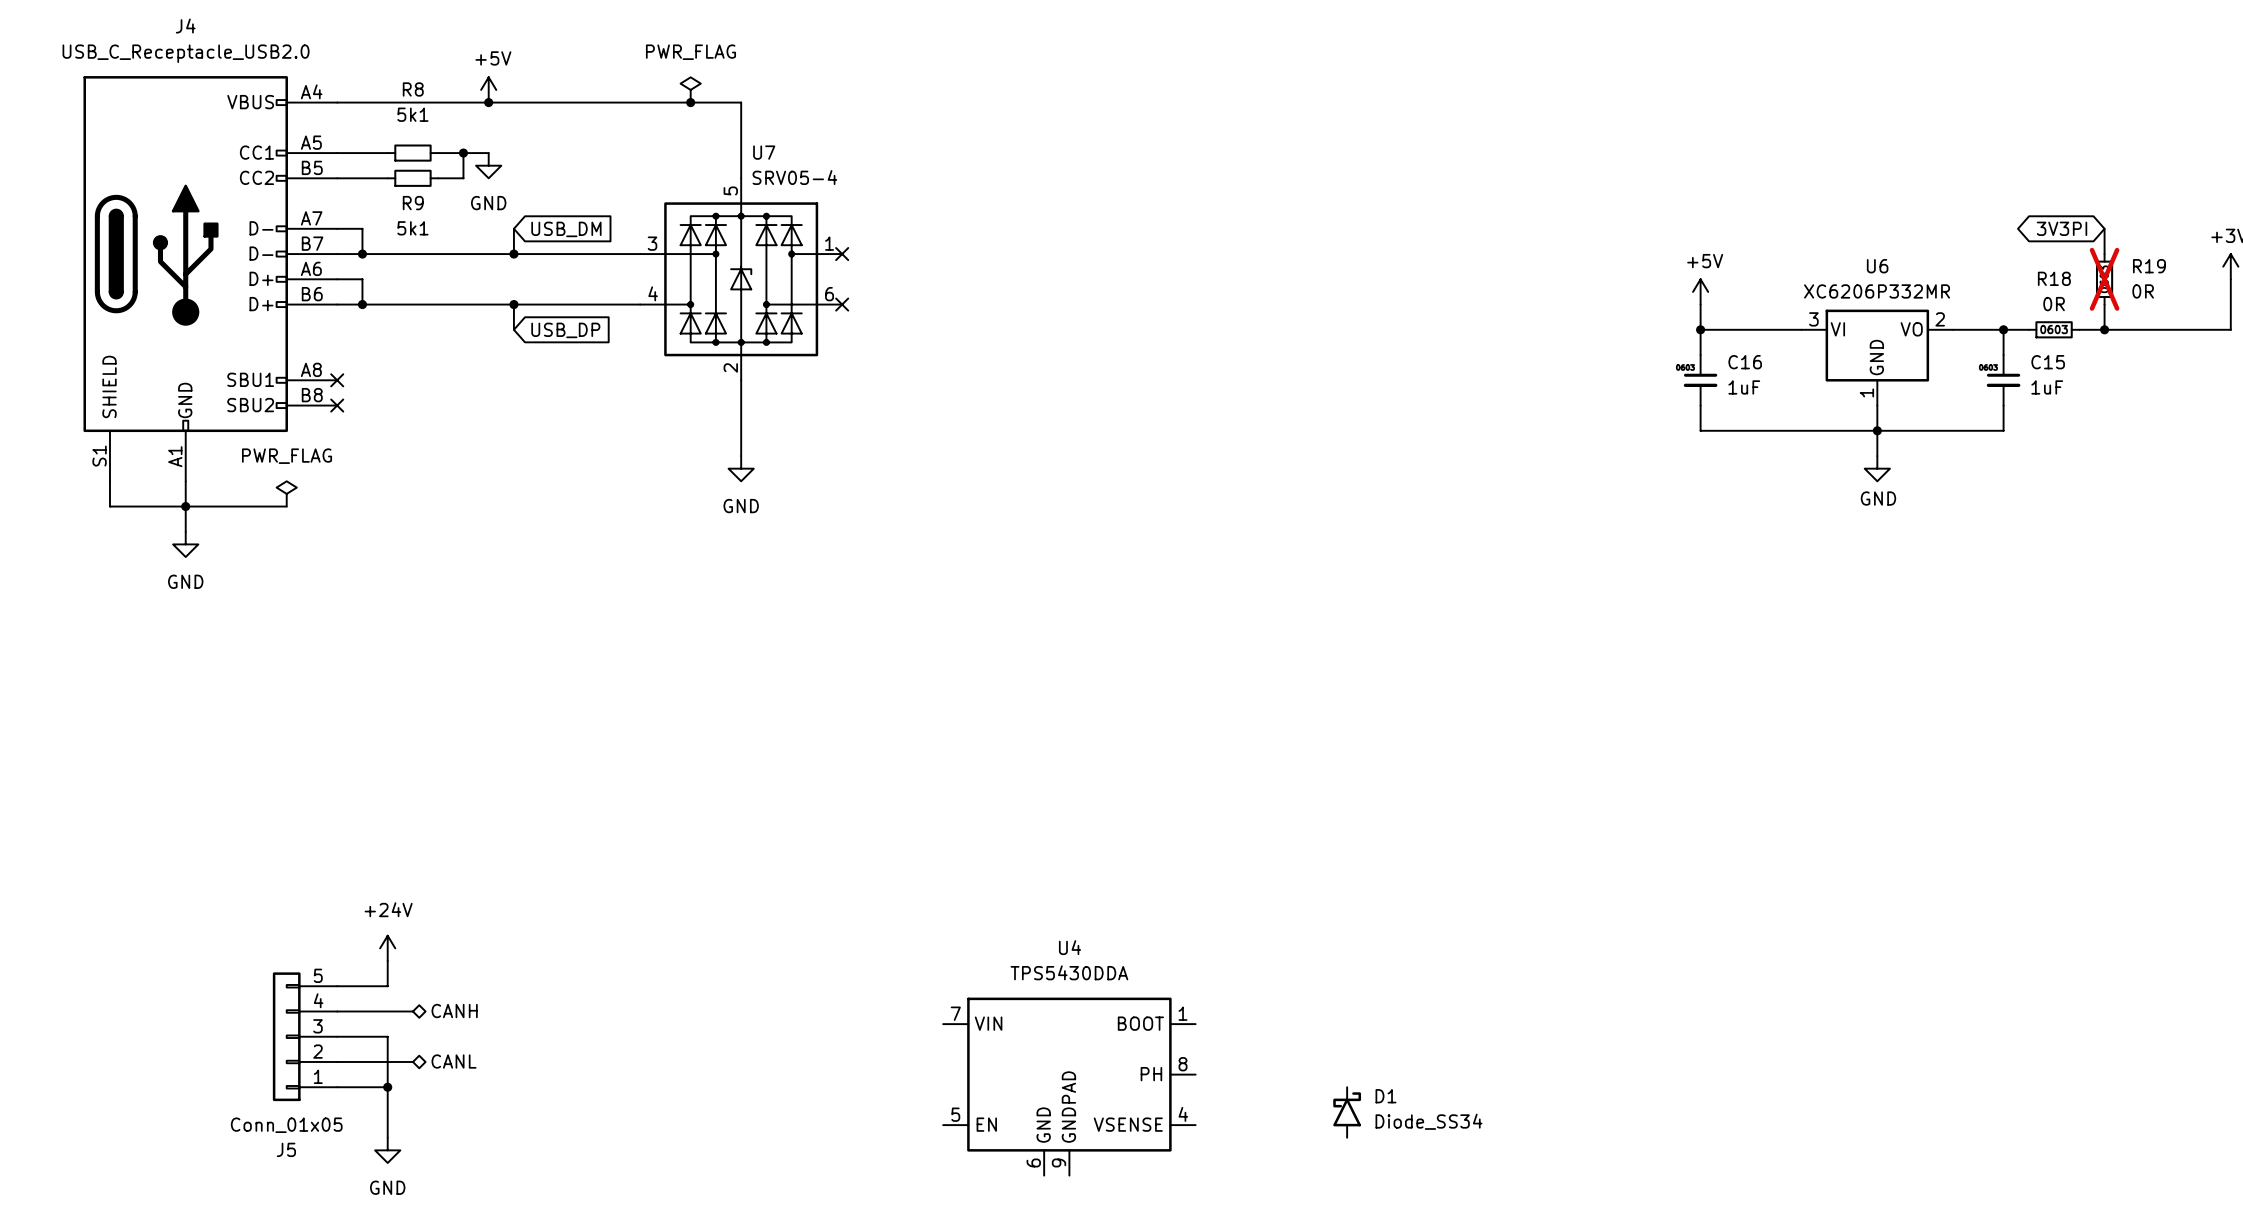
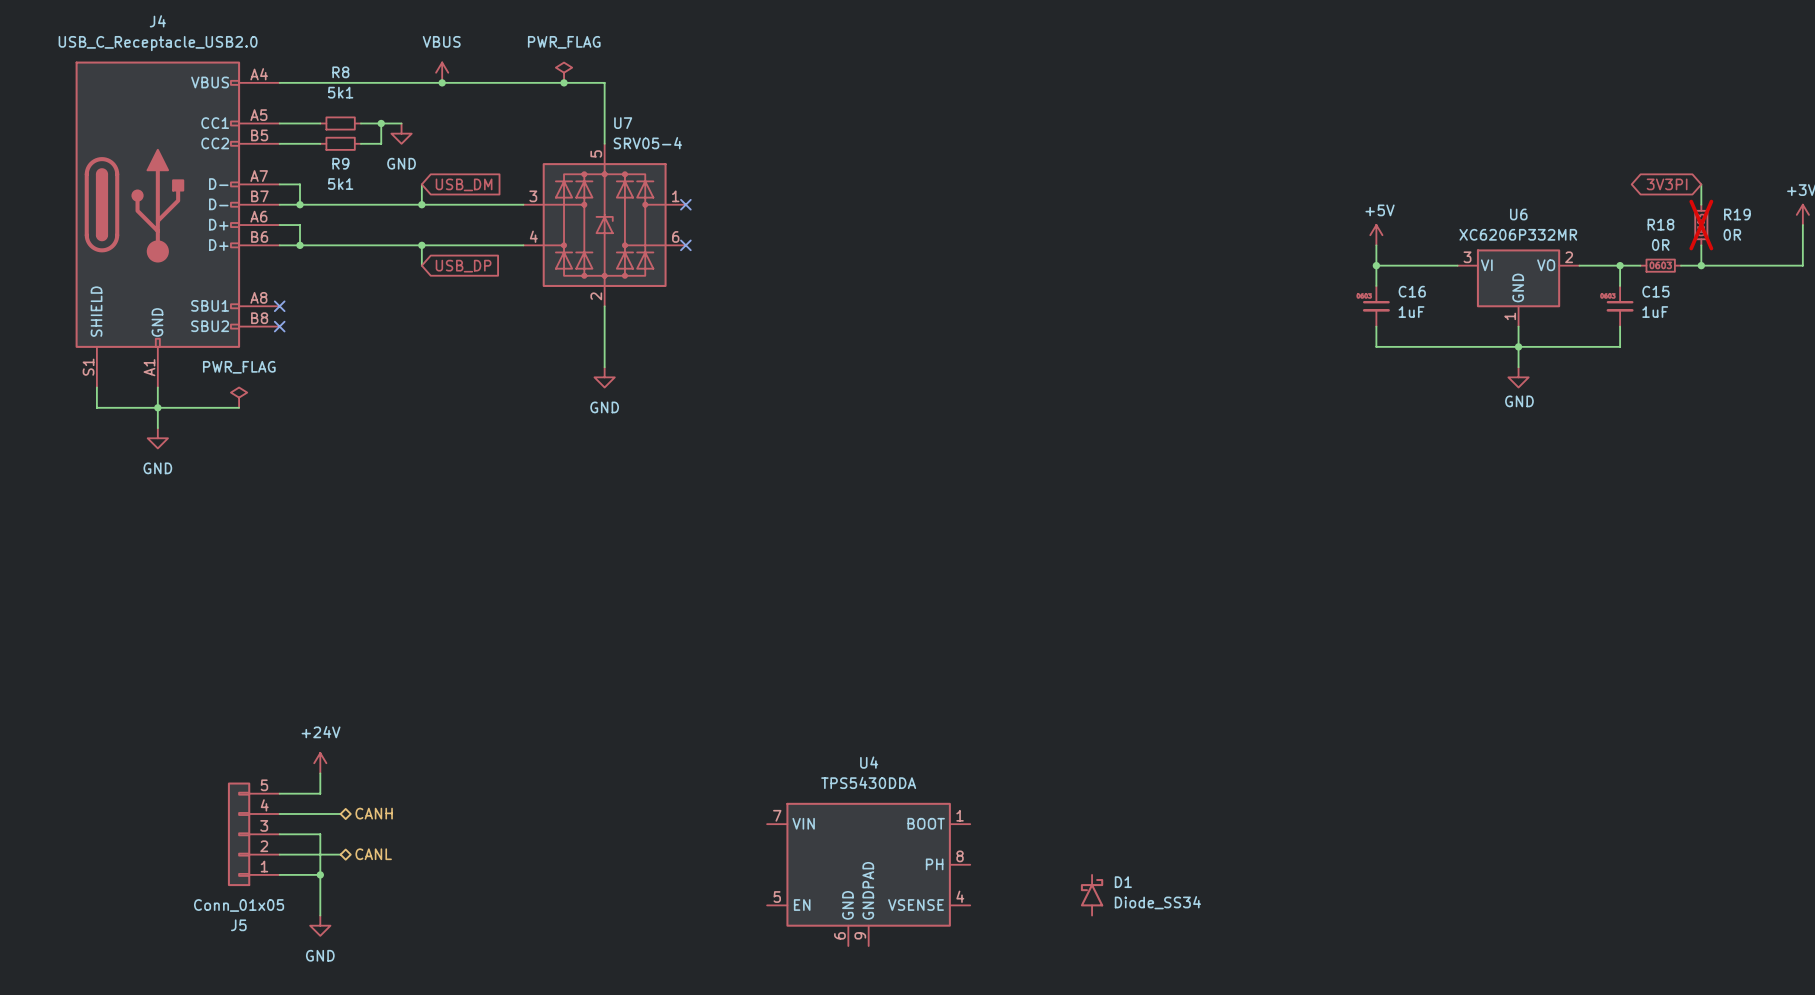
power symbol: +5V (488, 89) -> none
power symbol: none -> VBUS (442, 72)
junction position: (488, 102) -> (442, 82)

